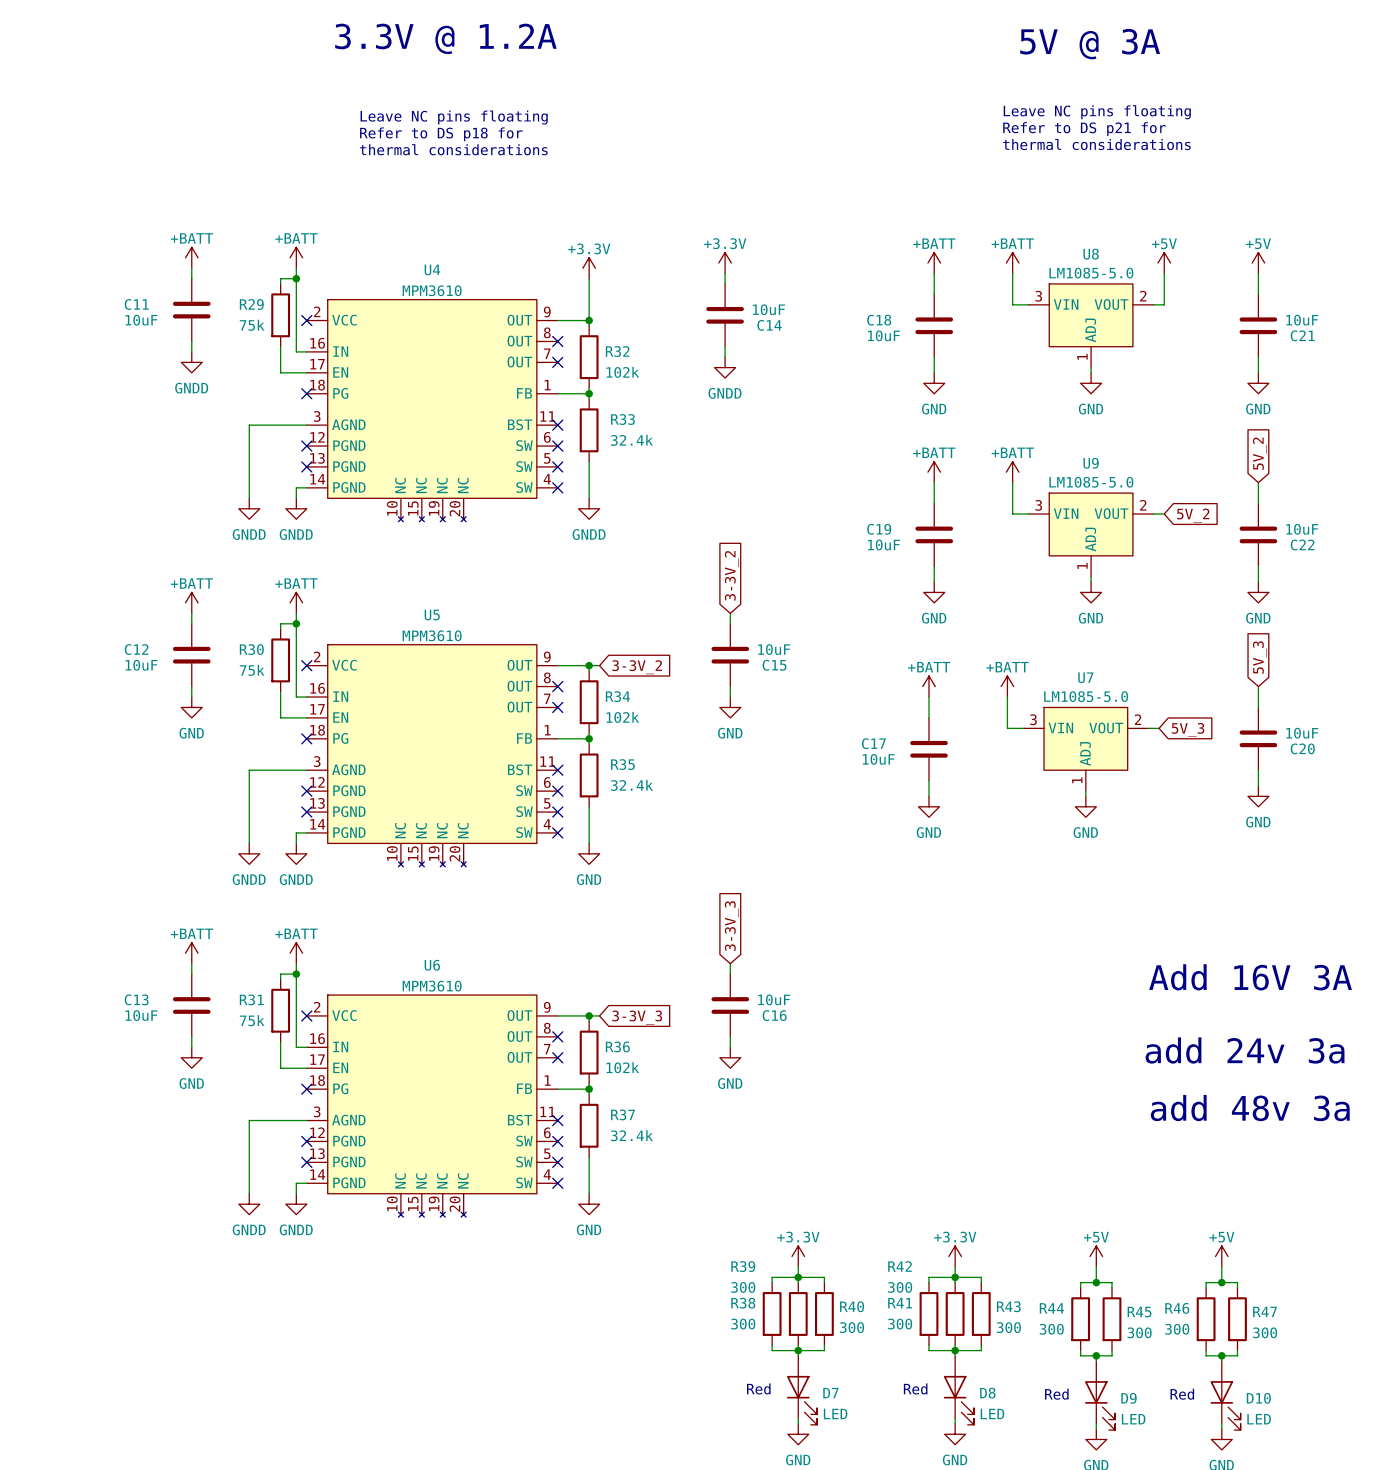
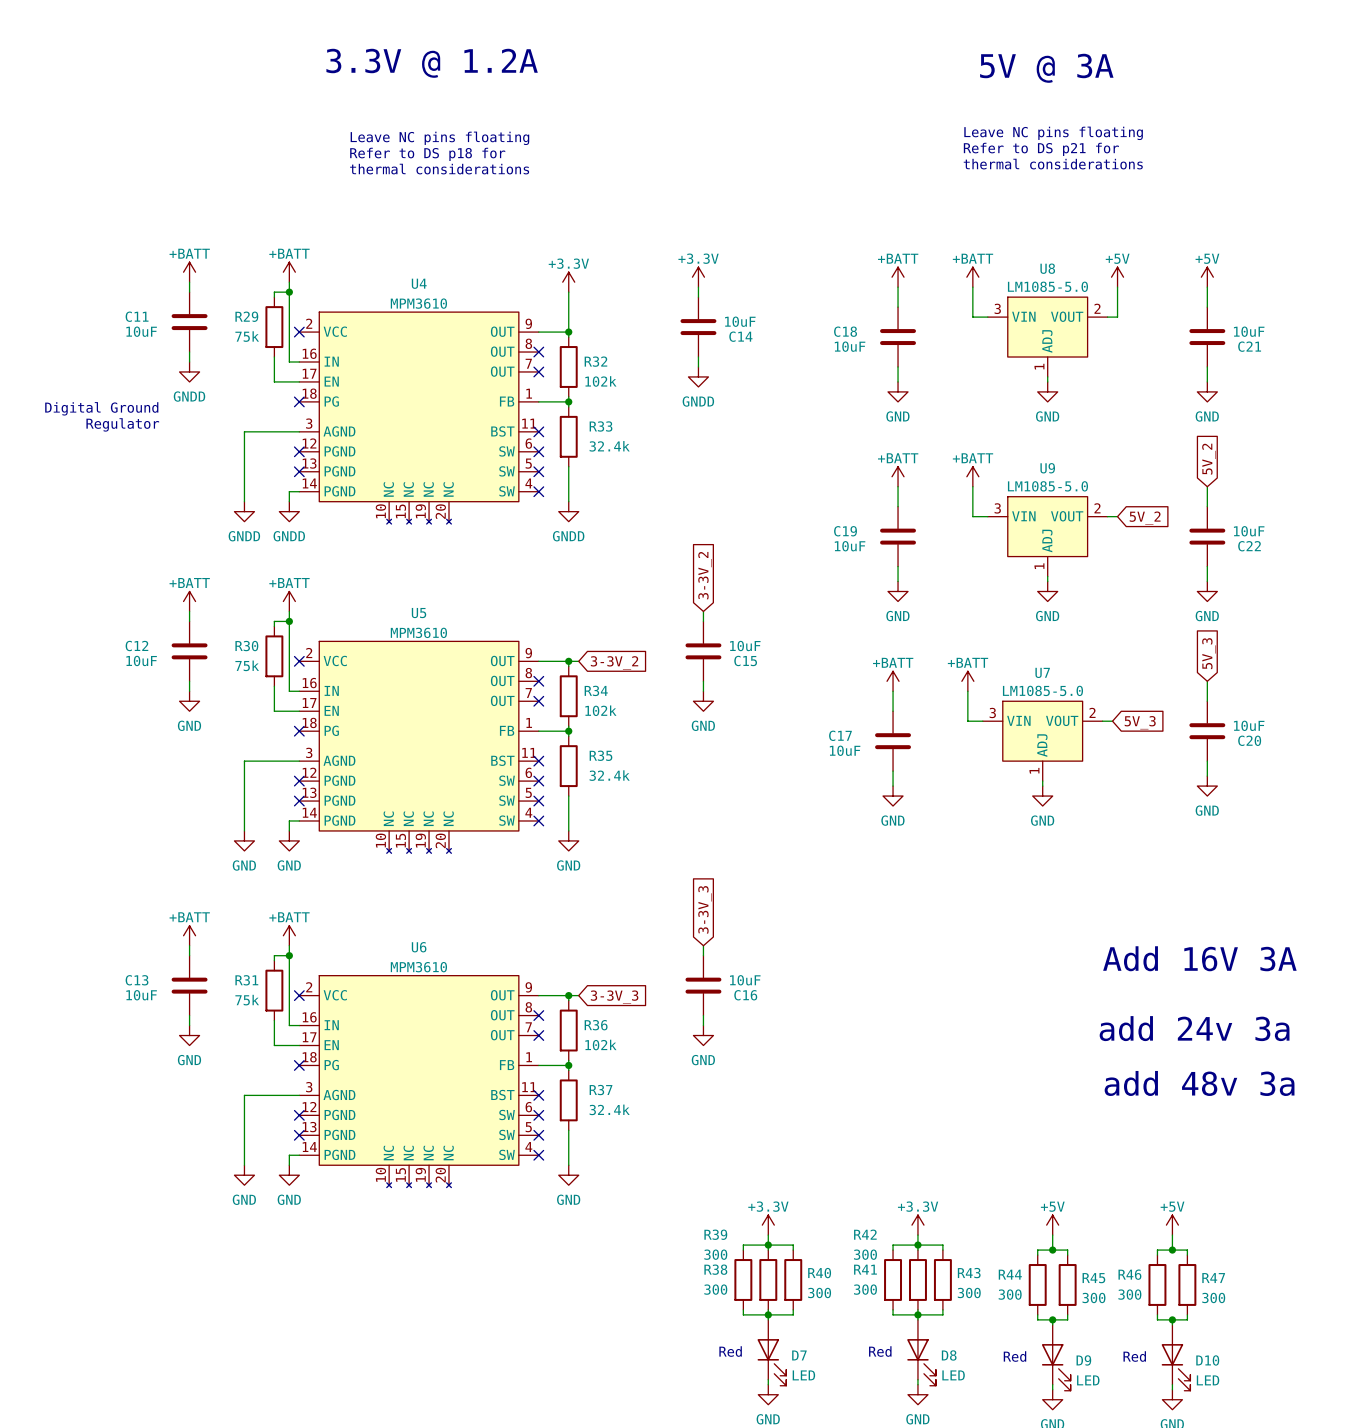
text: none -> Digital Ground (101, 408)
text: none -> Regulator (122, 424)
power symbol: GNDD (249, 853) -> GND (244, 840)
power symbol: GNDD (296, 853) -> GND (289, 840)
power symbol: GNDD (249, 1204) -> GND (244, 1175)
power symbol: GNDD (296, 1204) -> GND (289, 1175)

